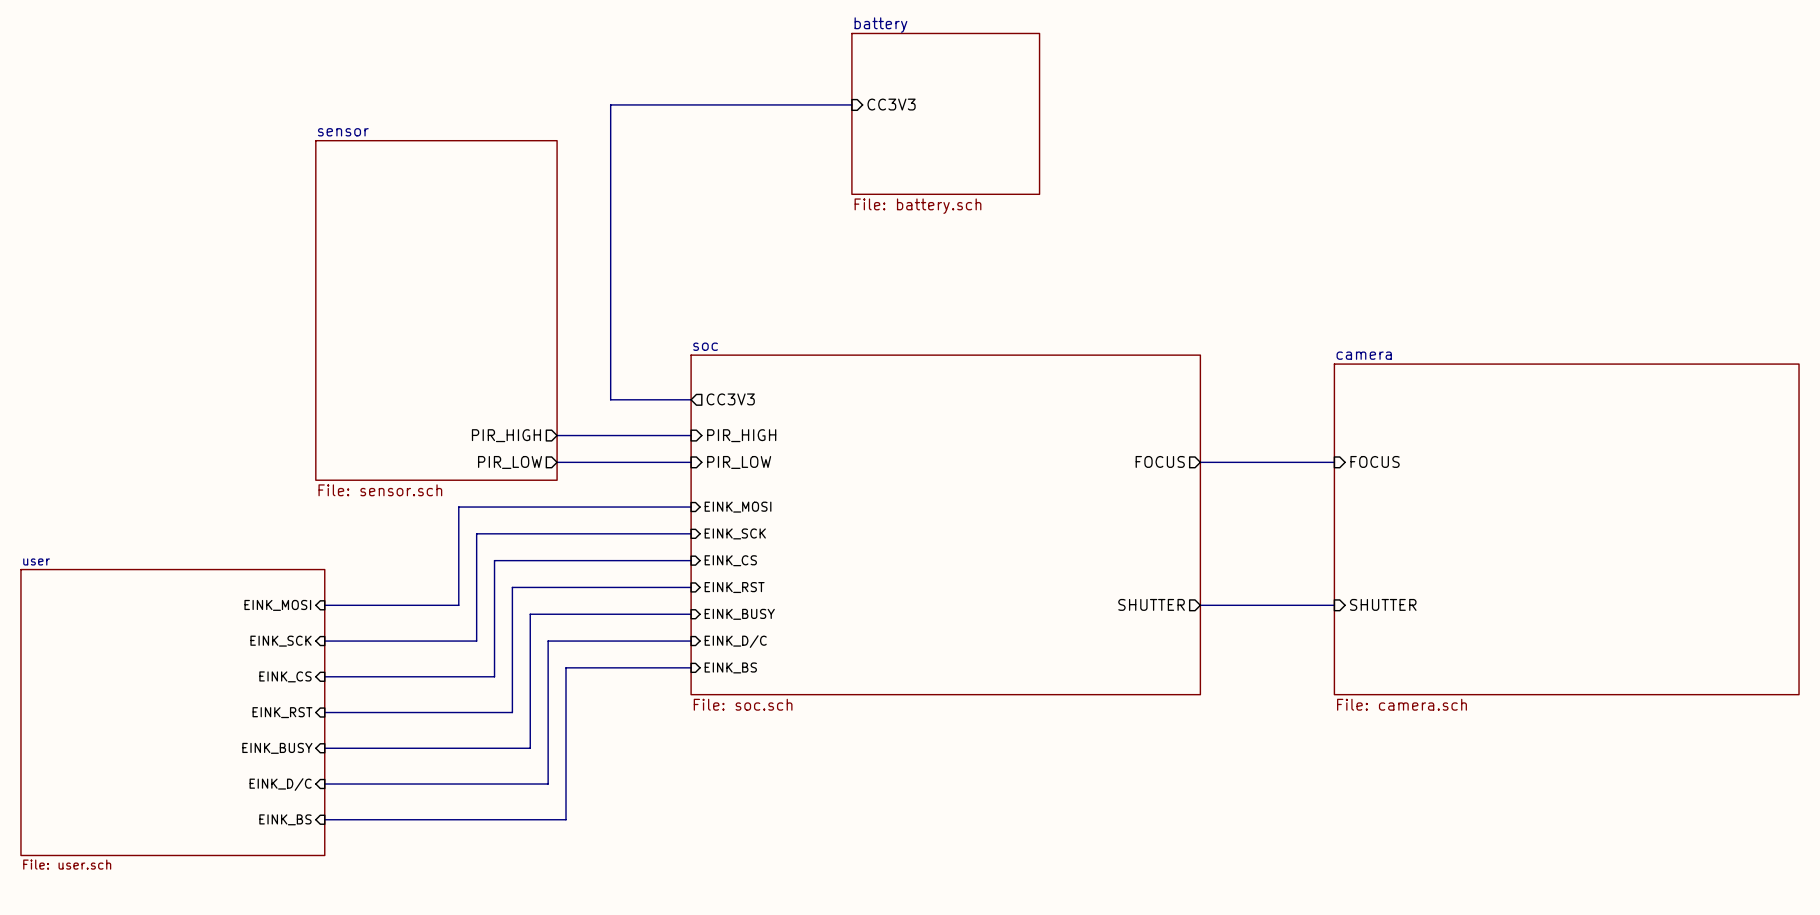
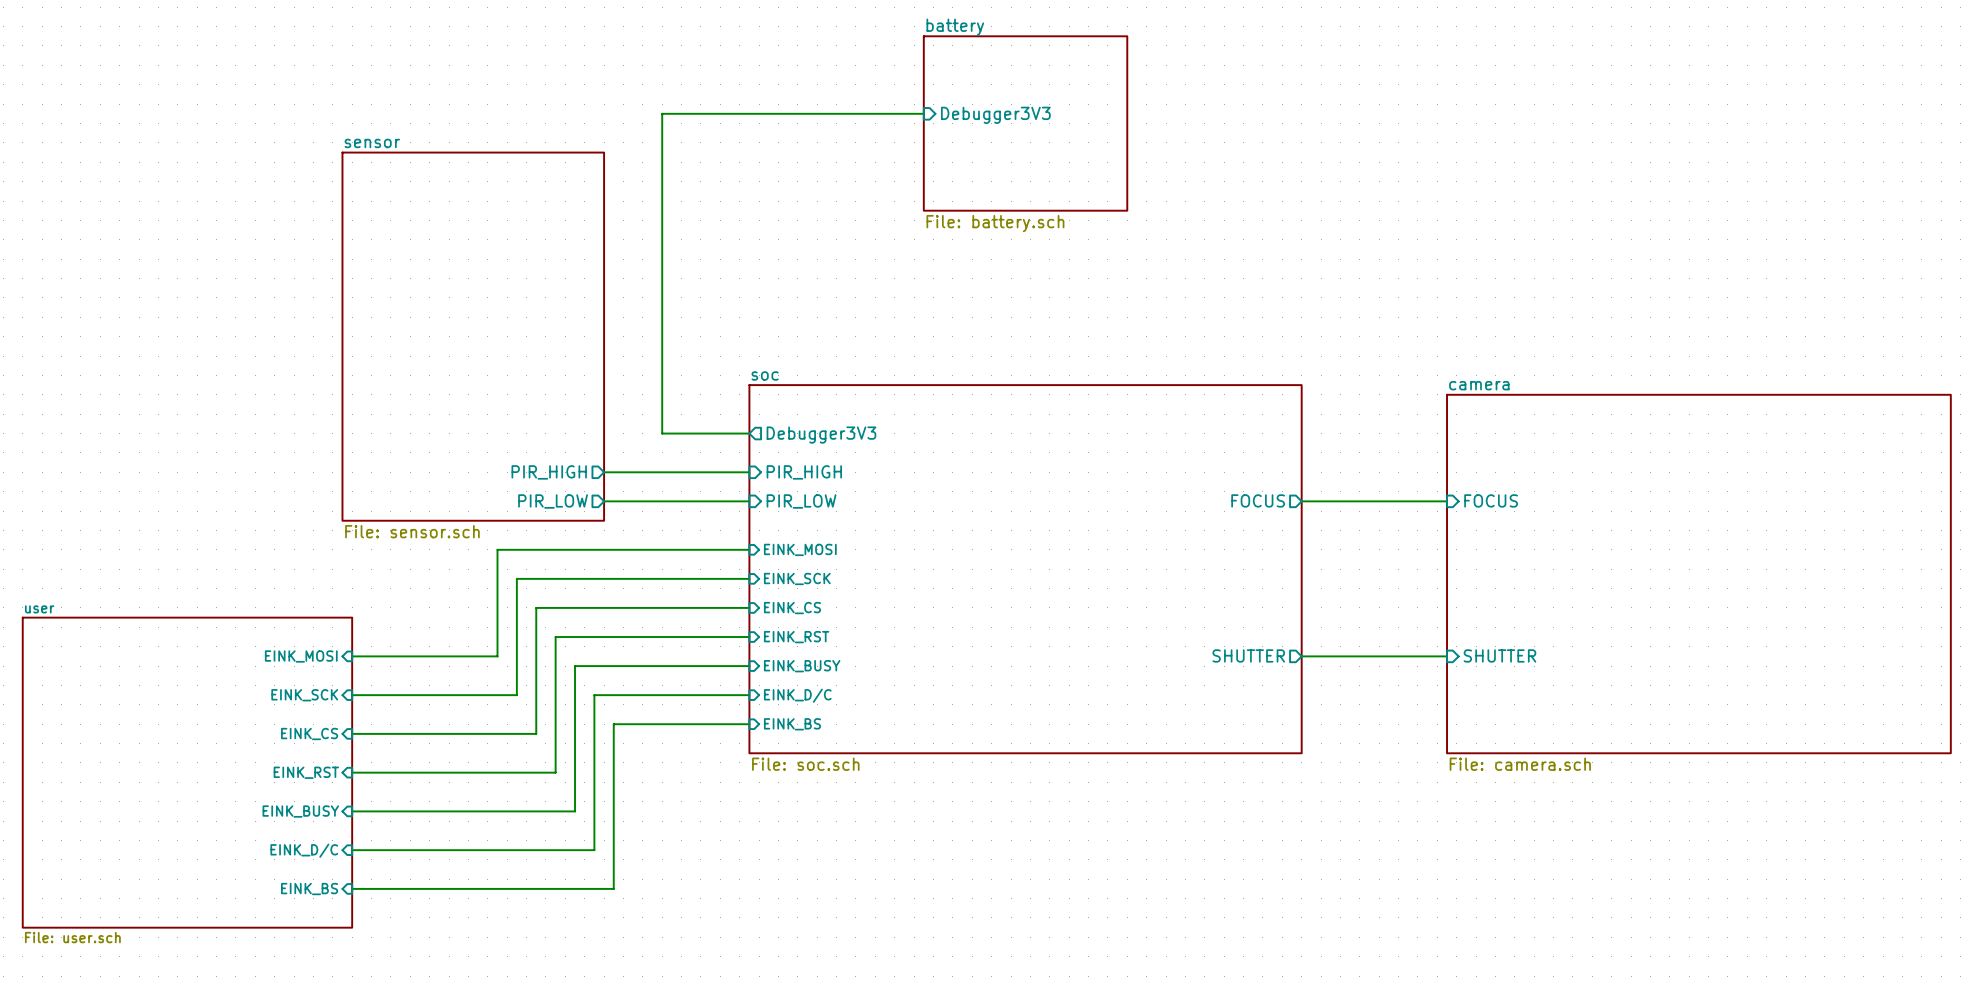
sheet pin: CC3V3 (891, 104) -> Debugger3V3 (995, 115)
sheet pin: CC3V3 (730, 399) -> Debugger3V3 (821, 435)

